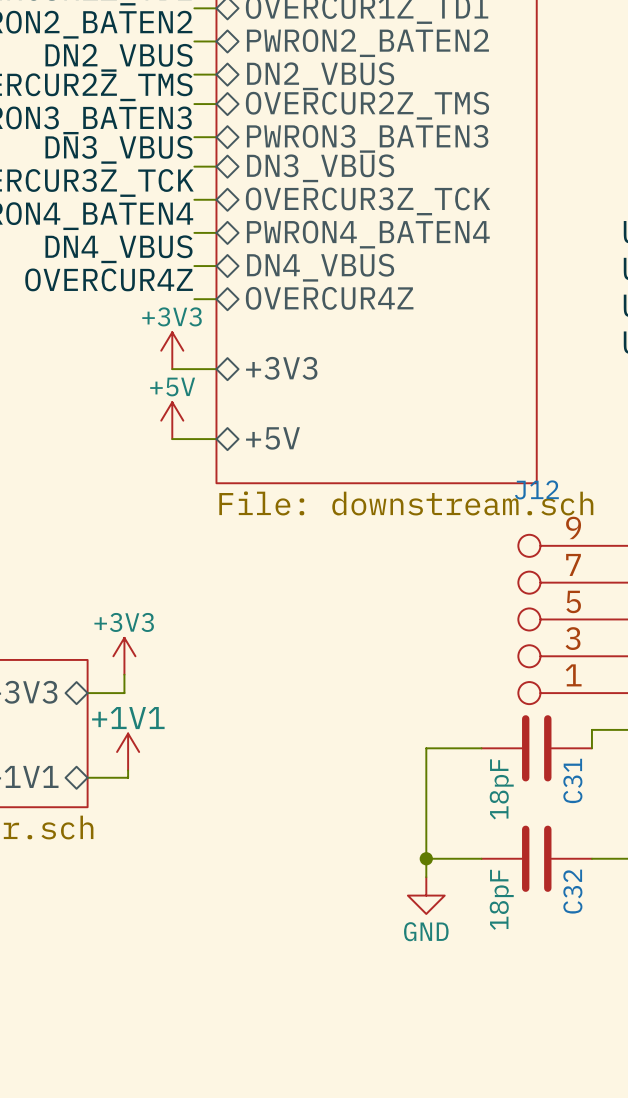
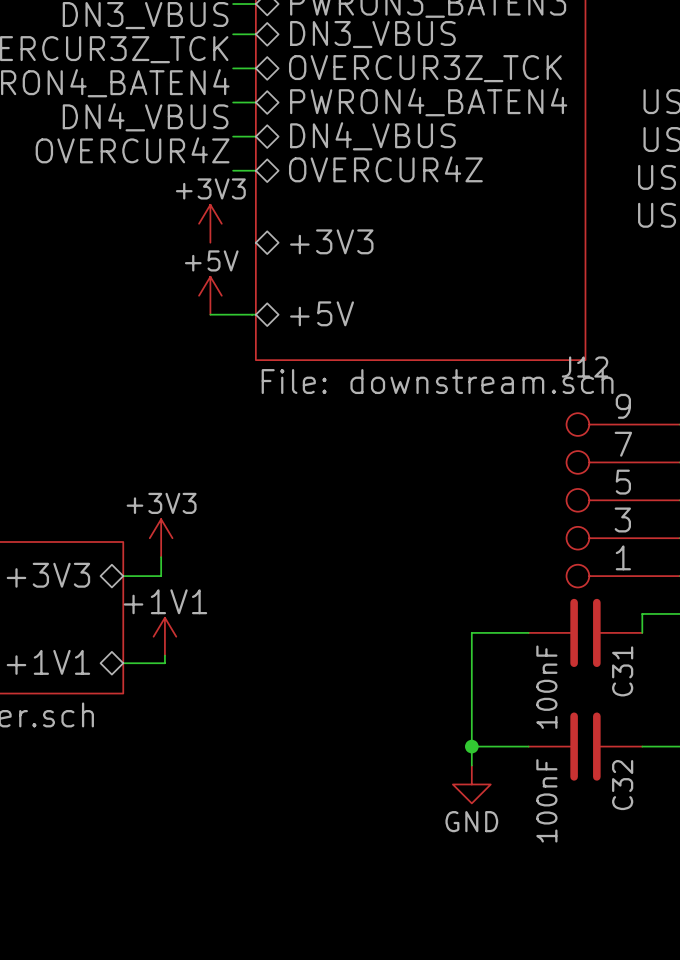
wire: (172, 369) (216, 369) -> none
C31 value: 18pF (501, 789) -> 100nF (546, 687)
C32 value: 18pF (501, 899) -> 100nF (546, 800)

